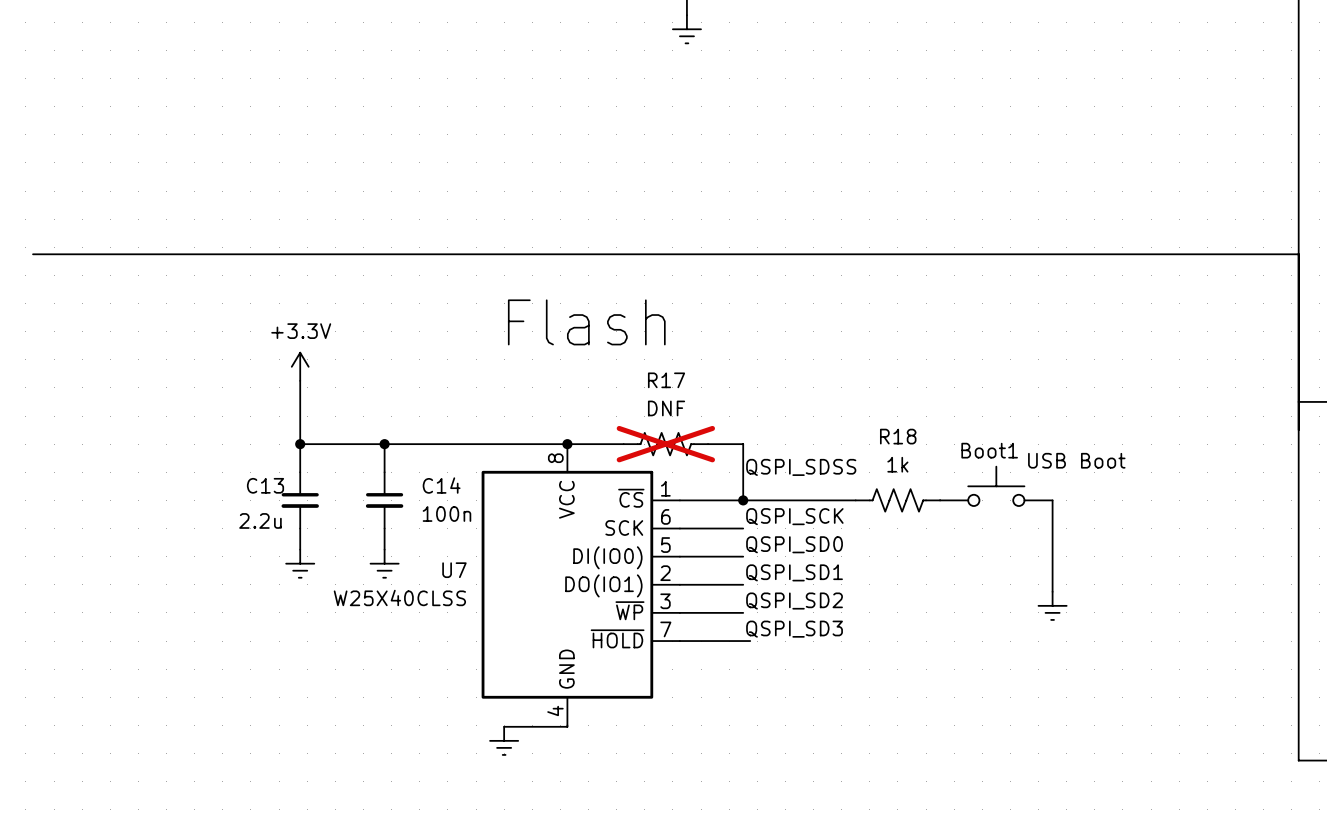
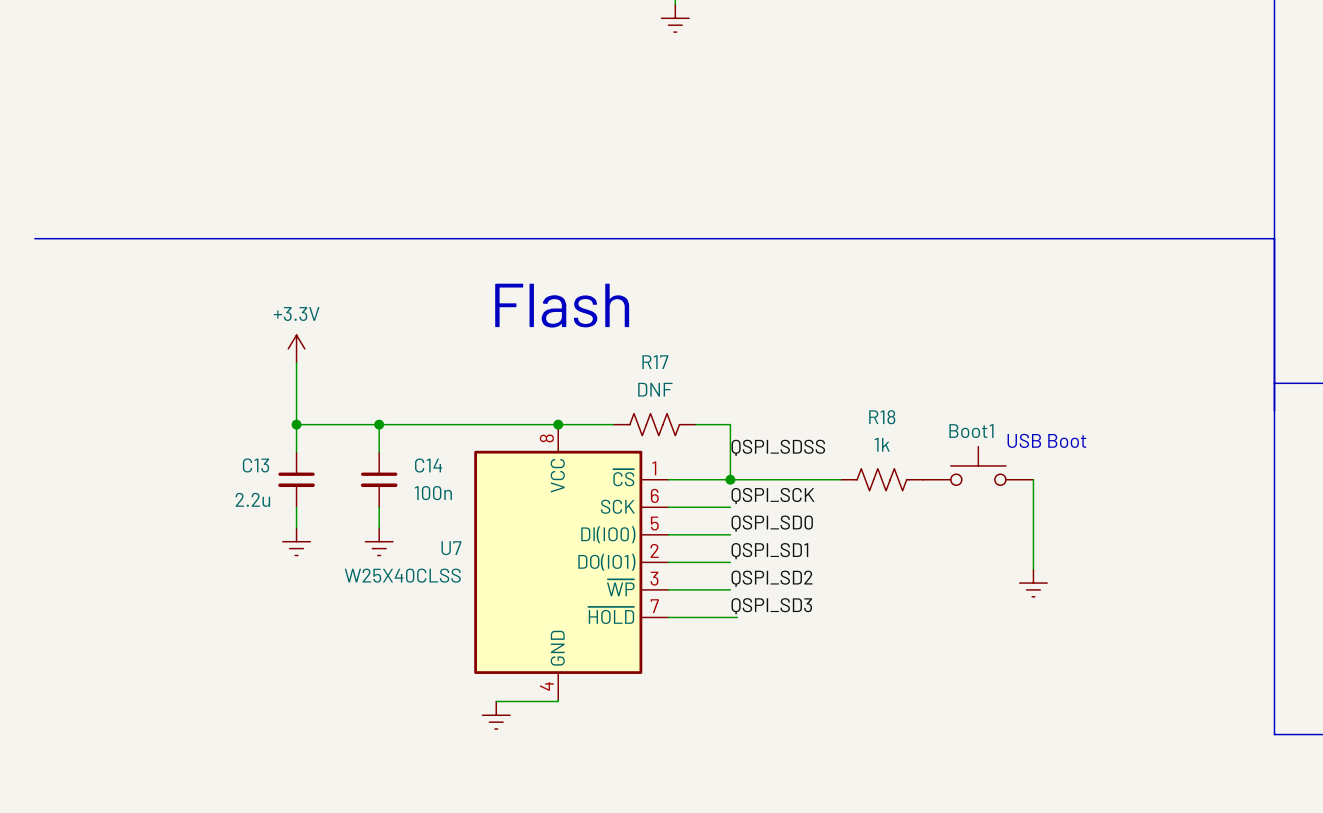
R17 do-not-place cross: (665, 444) -> none

